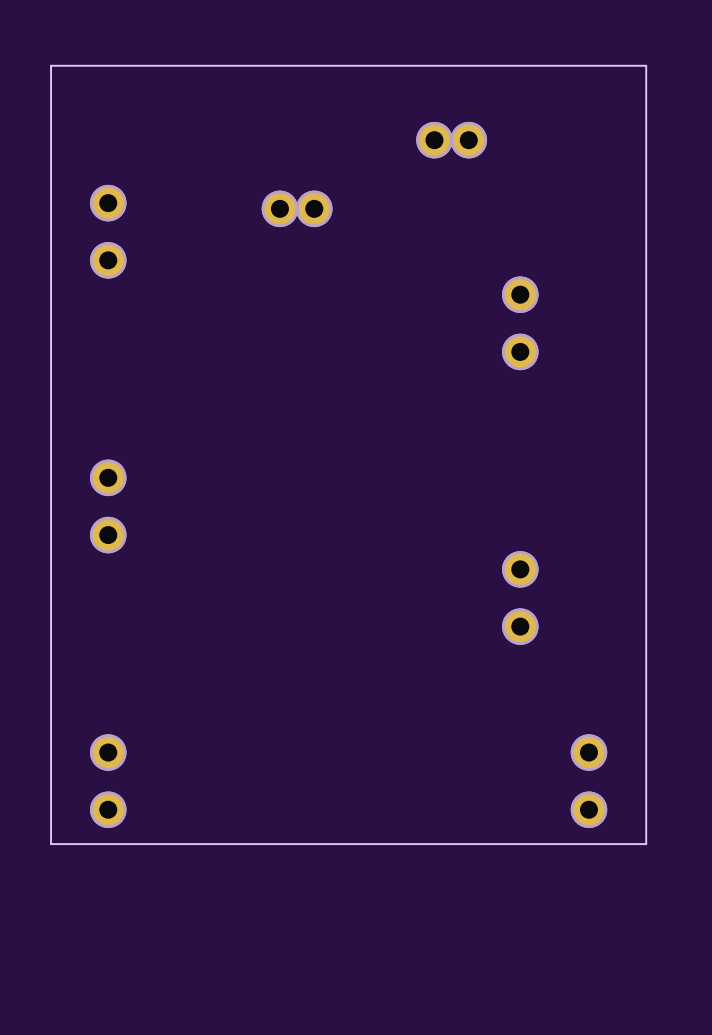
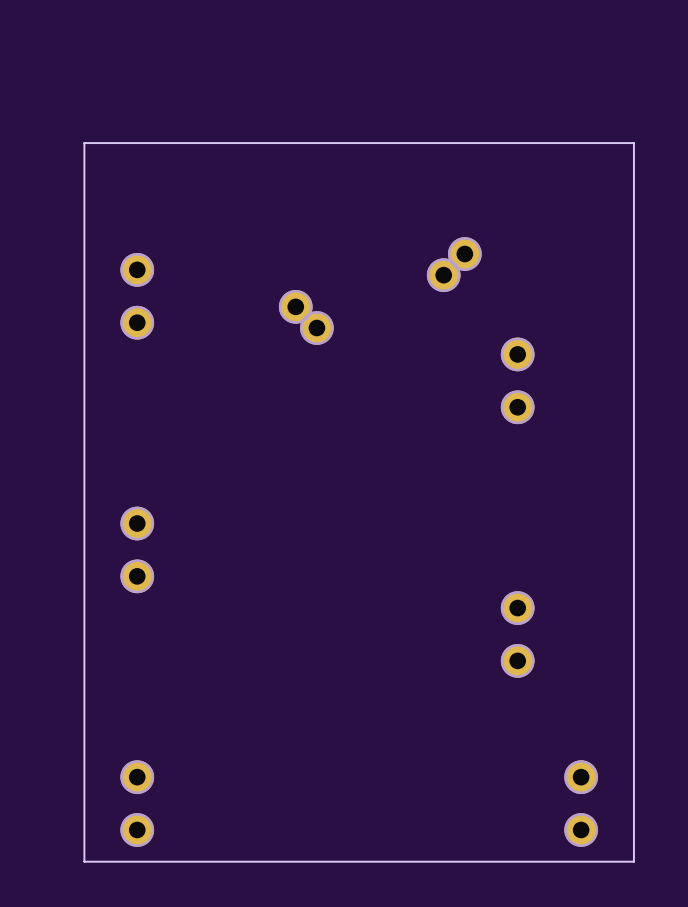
part: (434, 140) -> none
part: (468, 140) -> none
part: none -> (464, 254)
part: (279, 208) -> none
part: (314, 208) -> none
part: none -> (443, 275)
part: none -> (295, 306)
part: none -> (316, 328)

